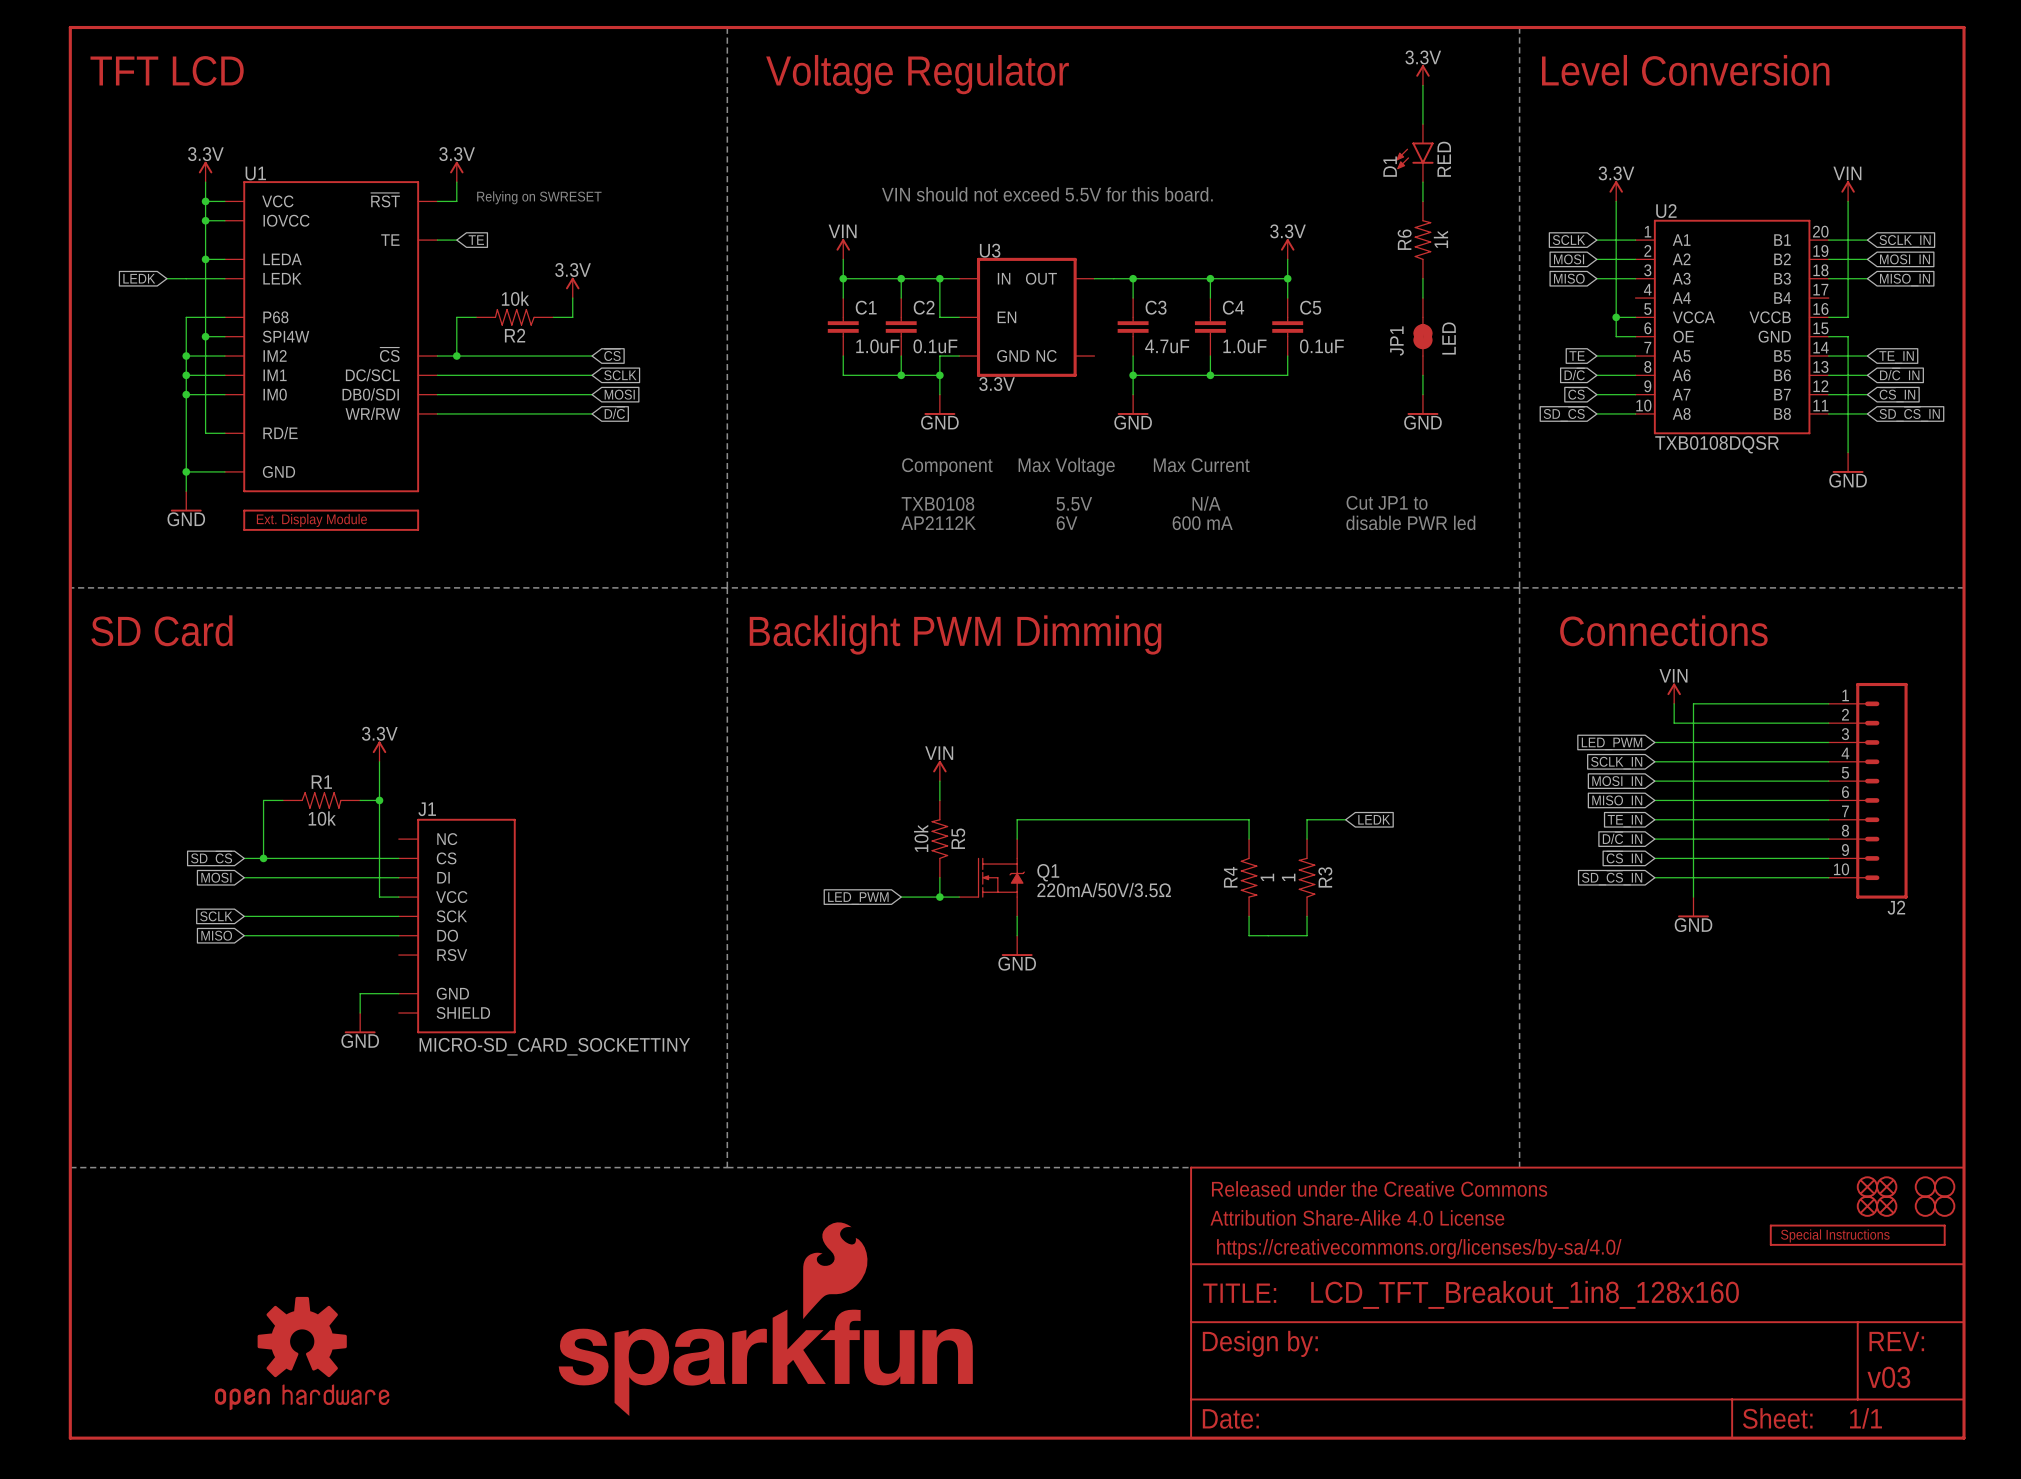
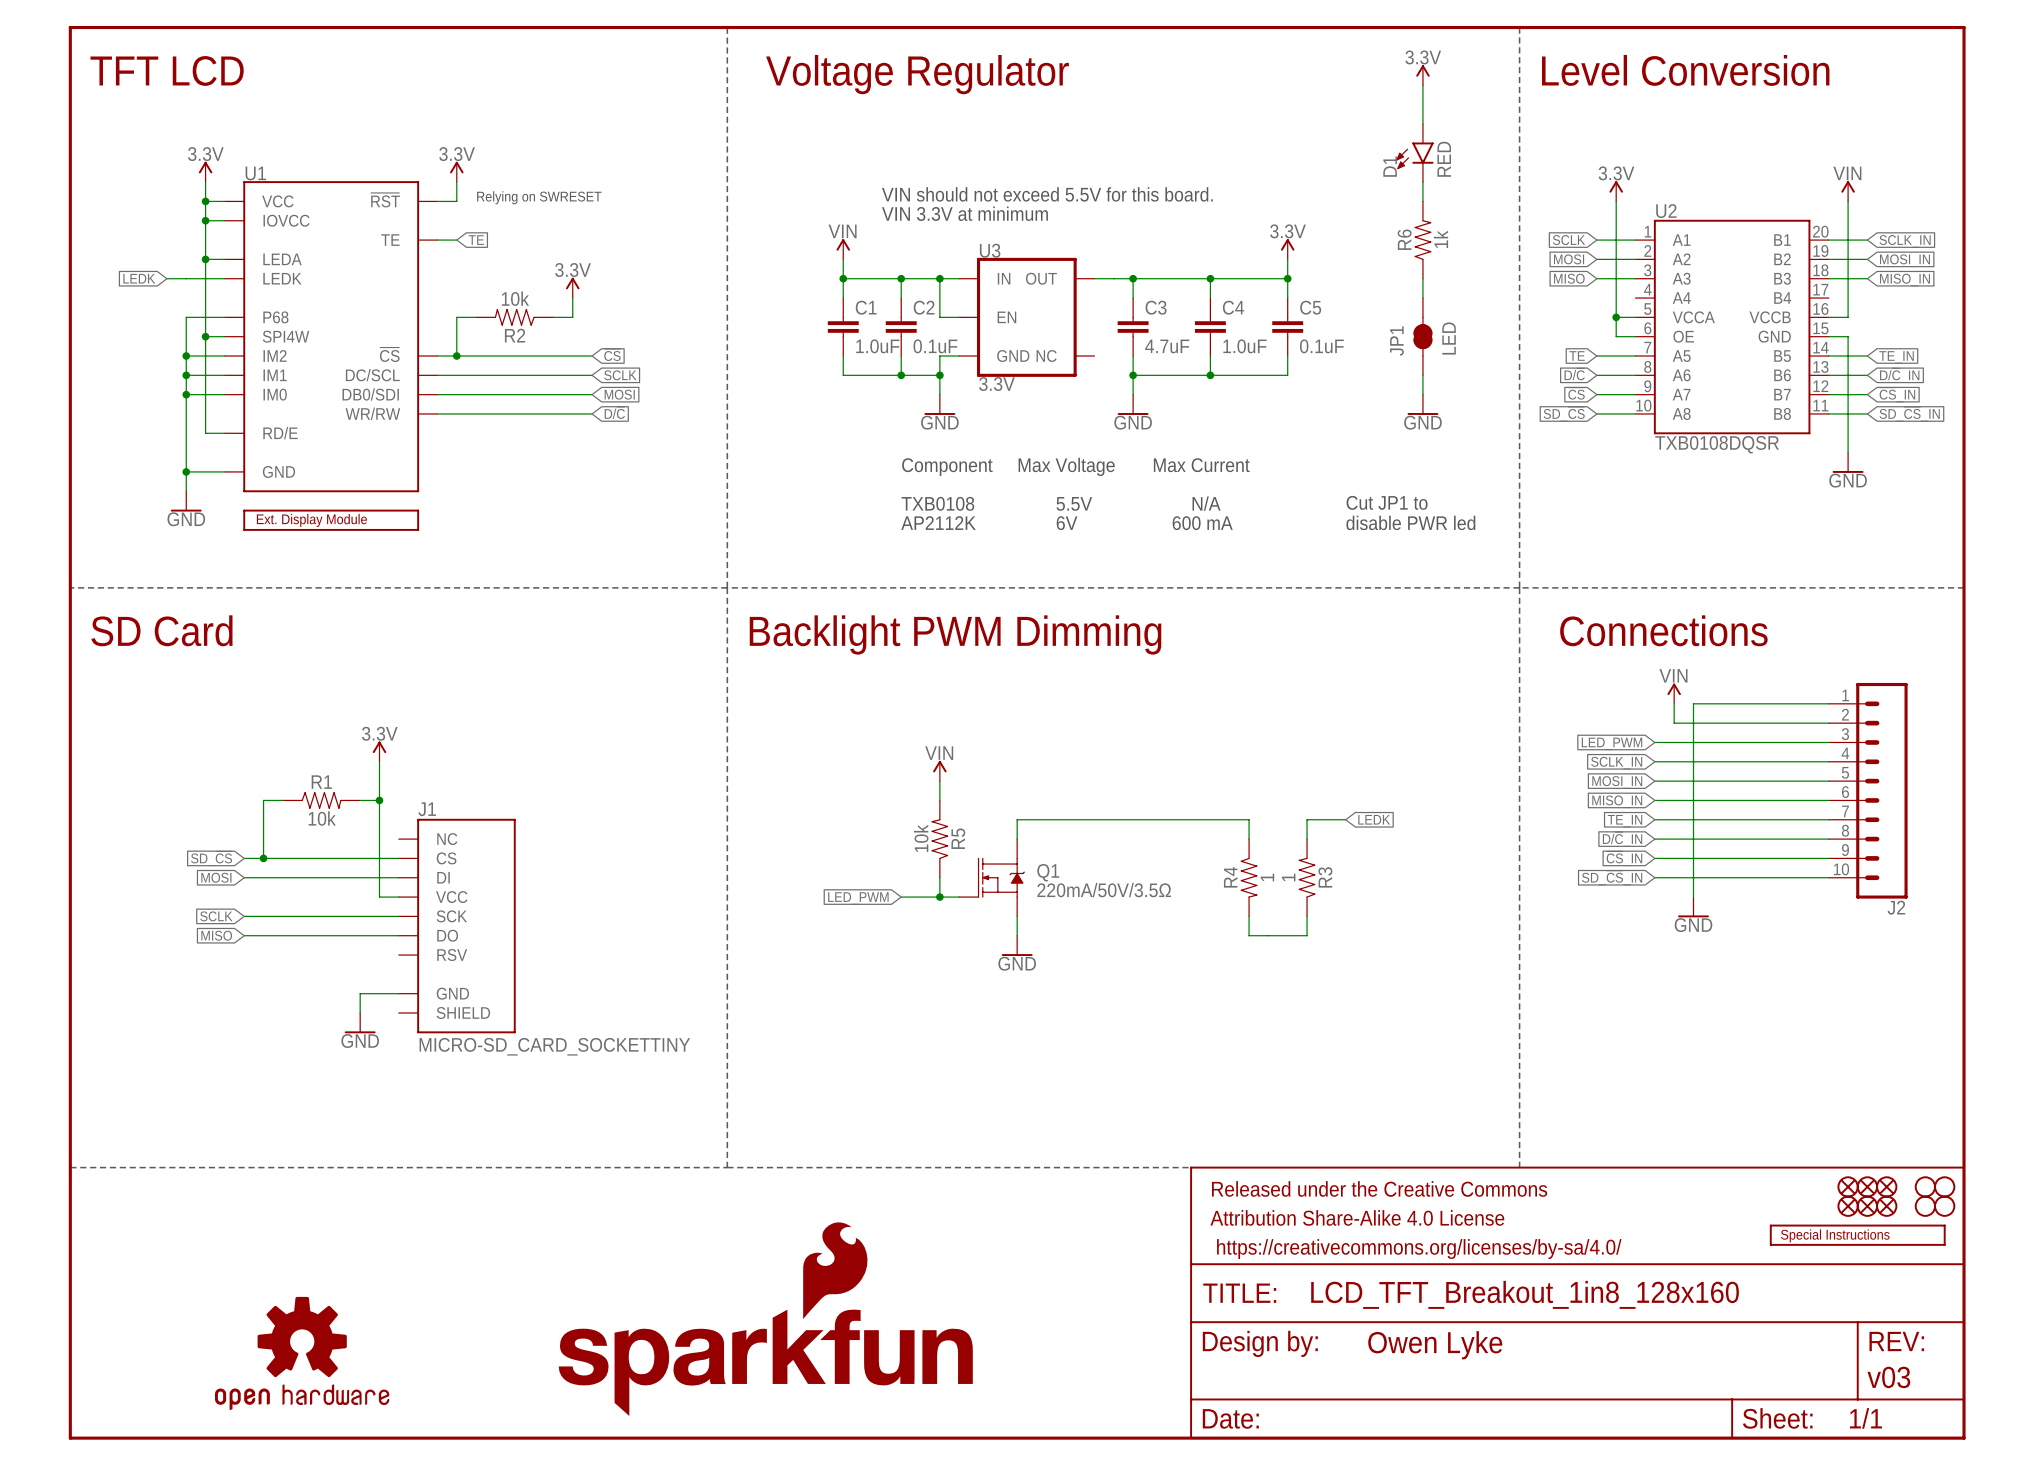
text: none -> VIN 3.3V at minimum (964, 213)
part: none -> (1848, 1186)
part: none -> (1848, 1206)
part text: none -> Owen Lyke (1435, 1345)

